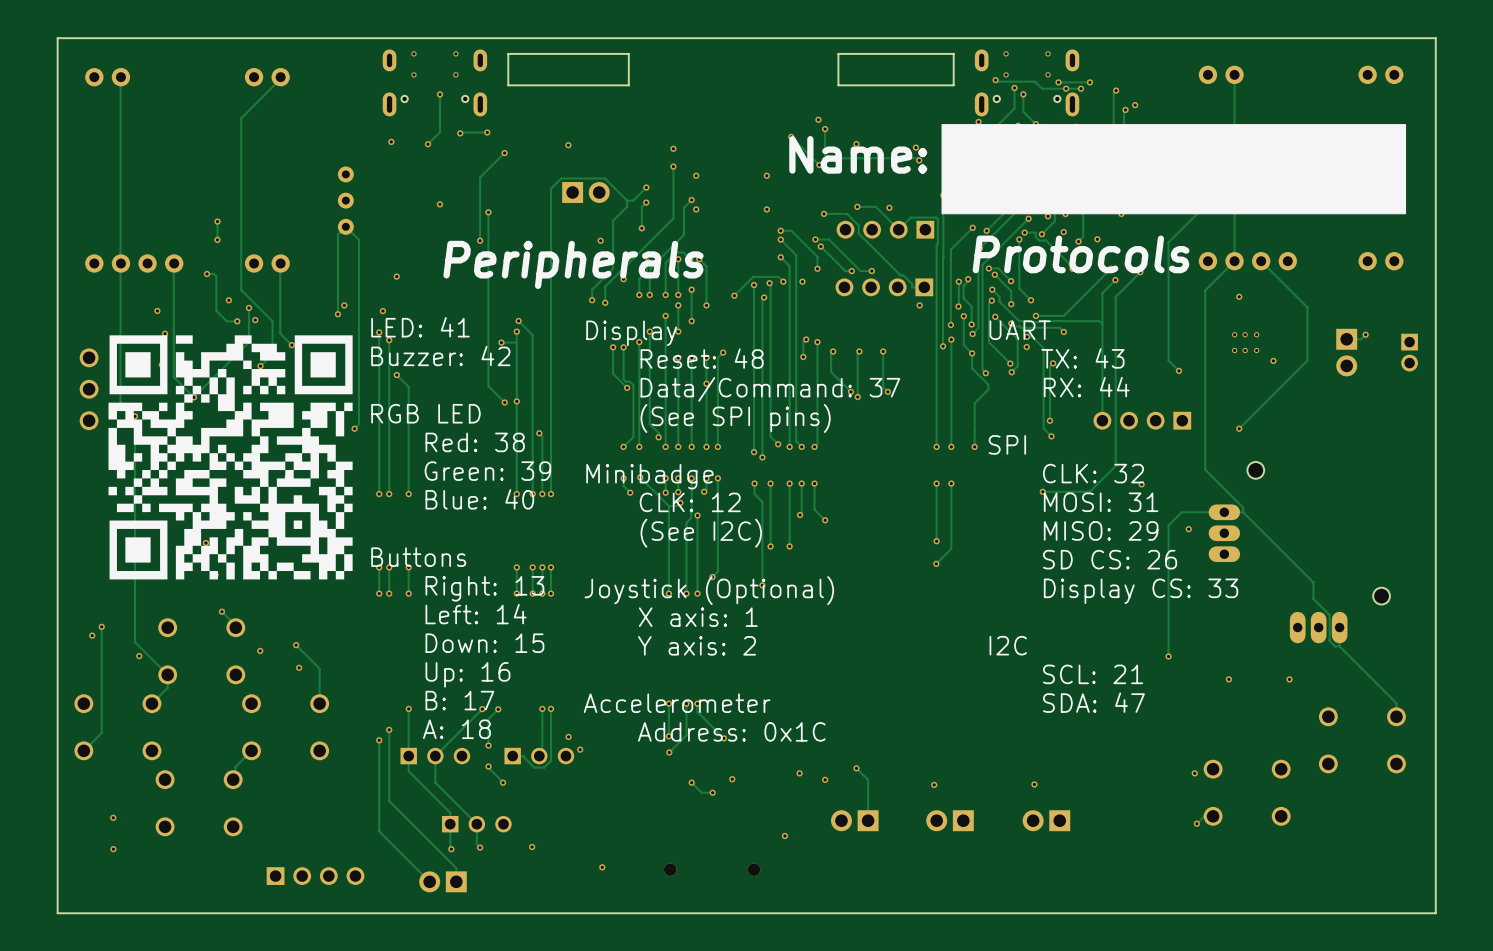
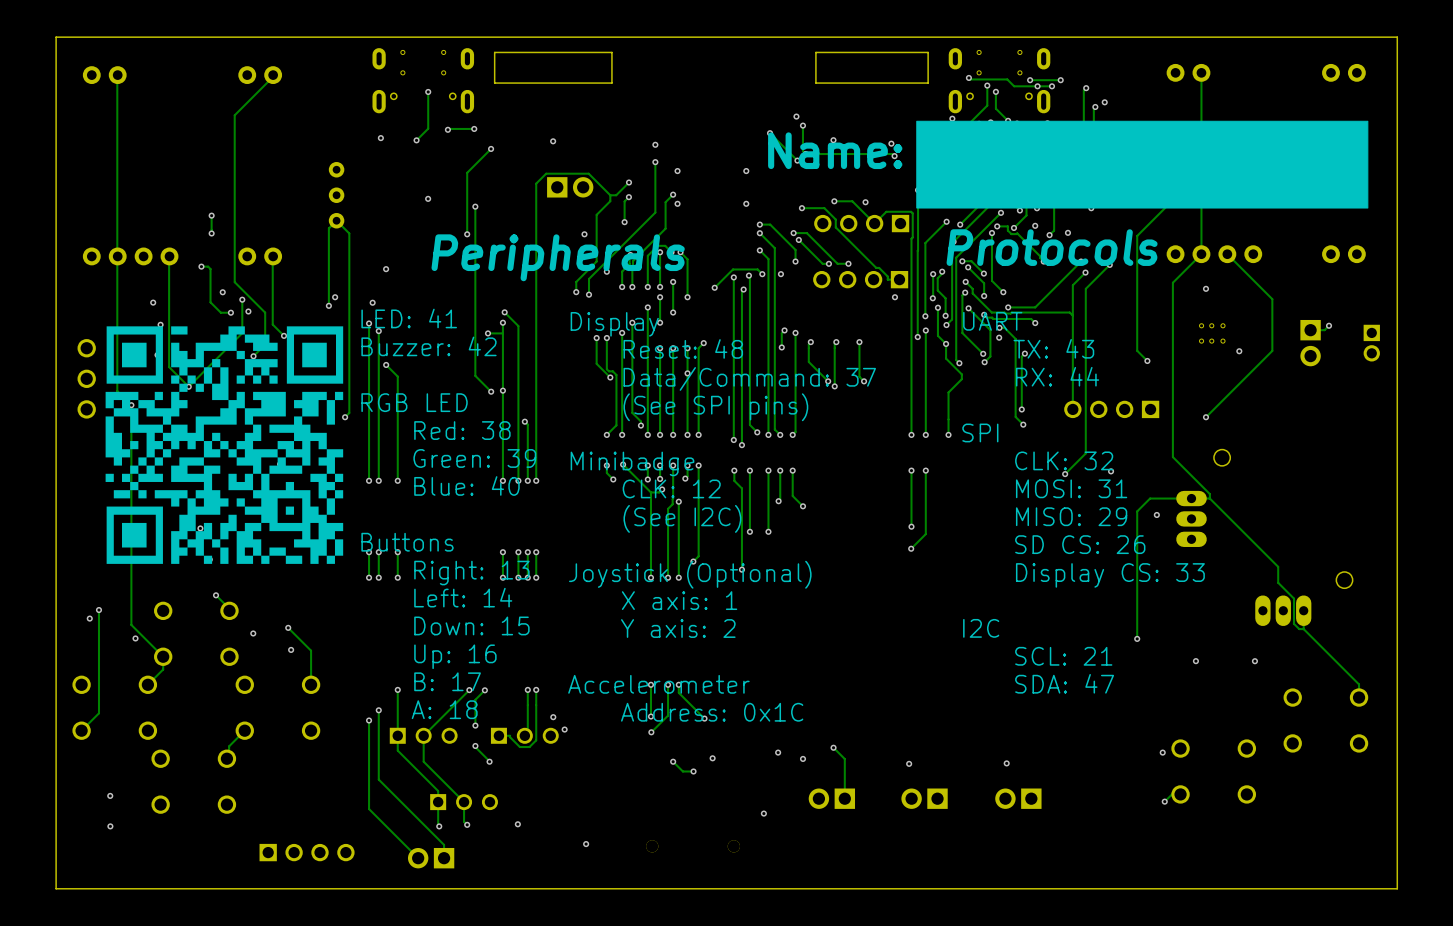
track: (1094, 487) (1089, 491) (1042, 491) -> none
via position: (1042, 491) -> (1065, 474)

